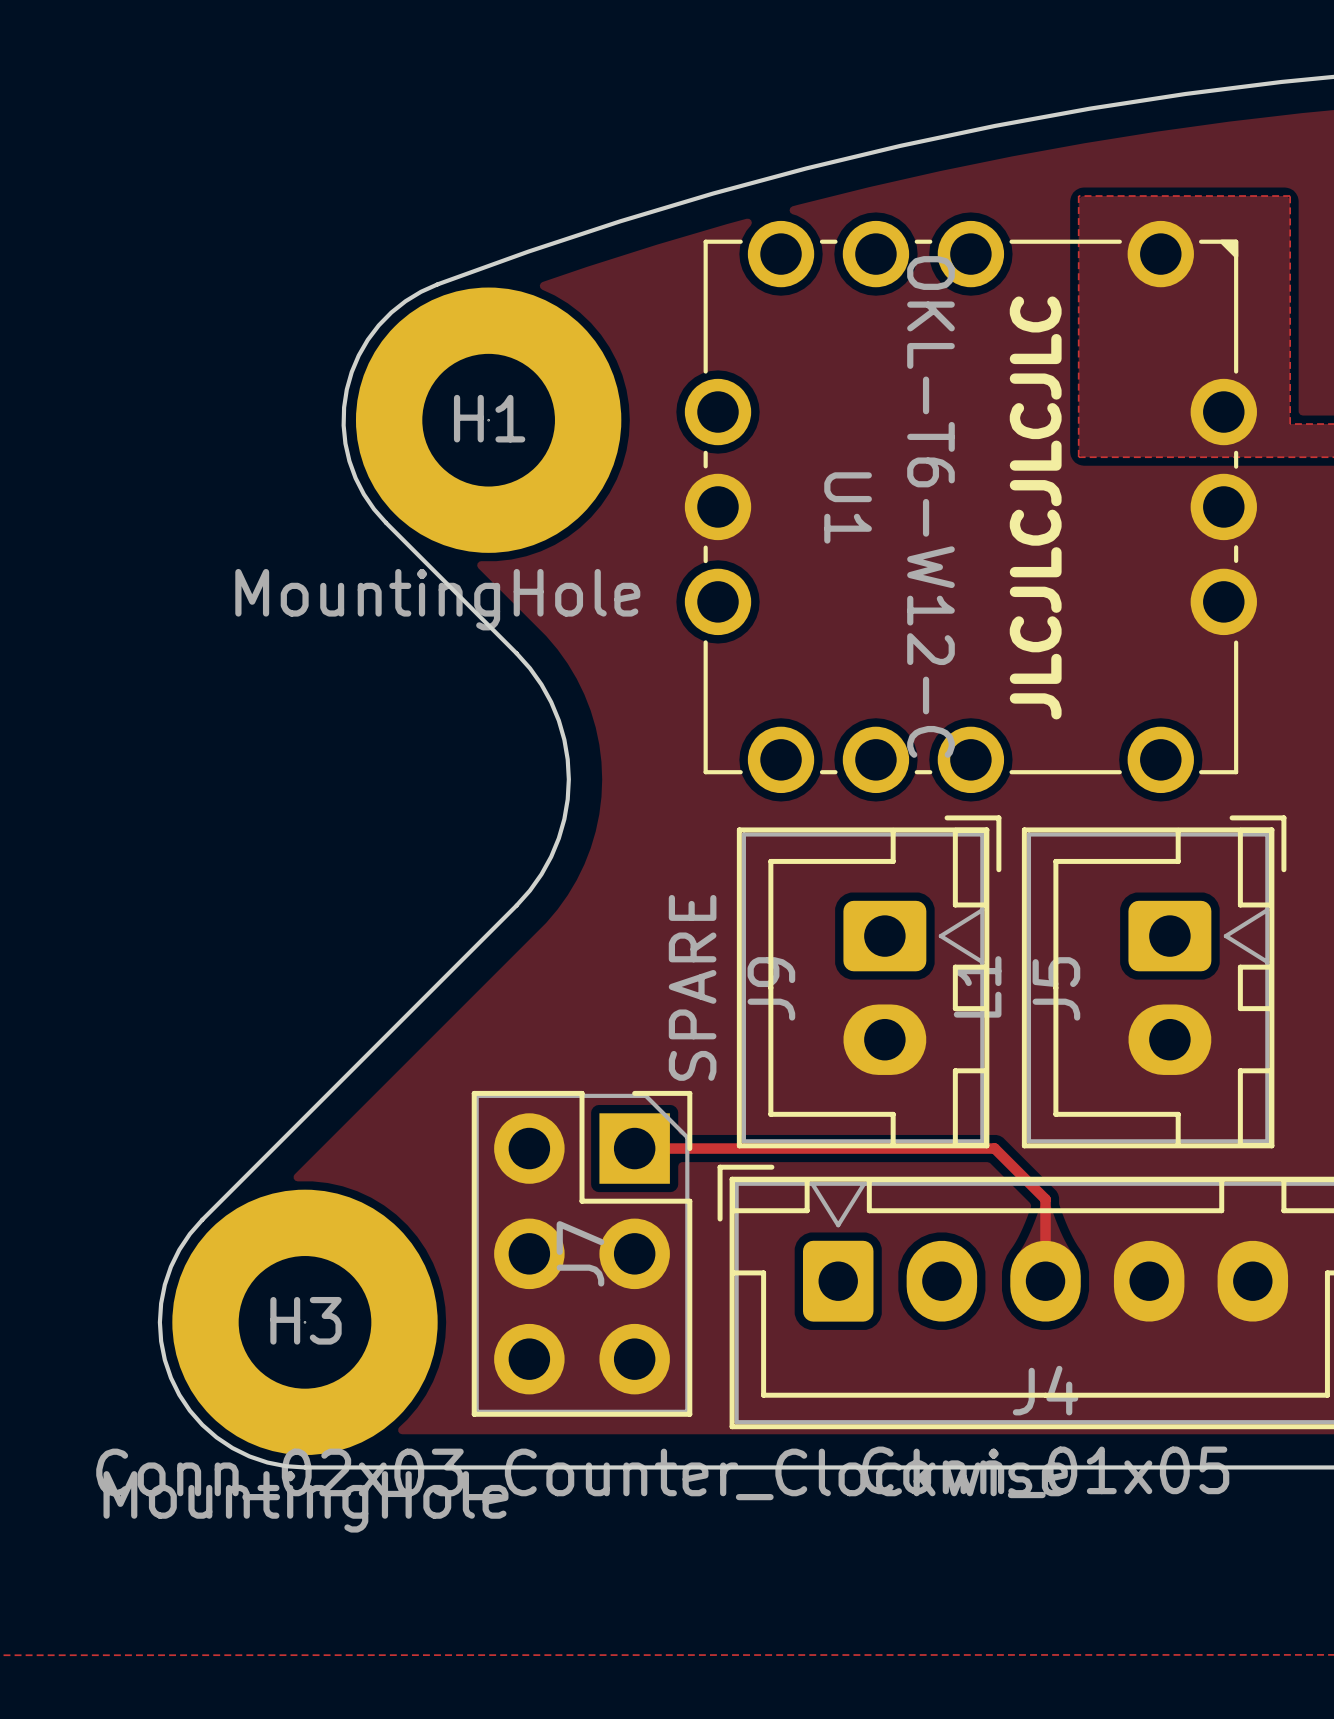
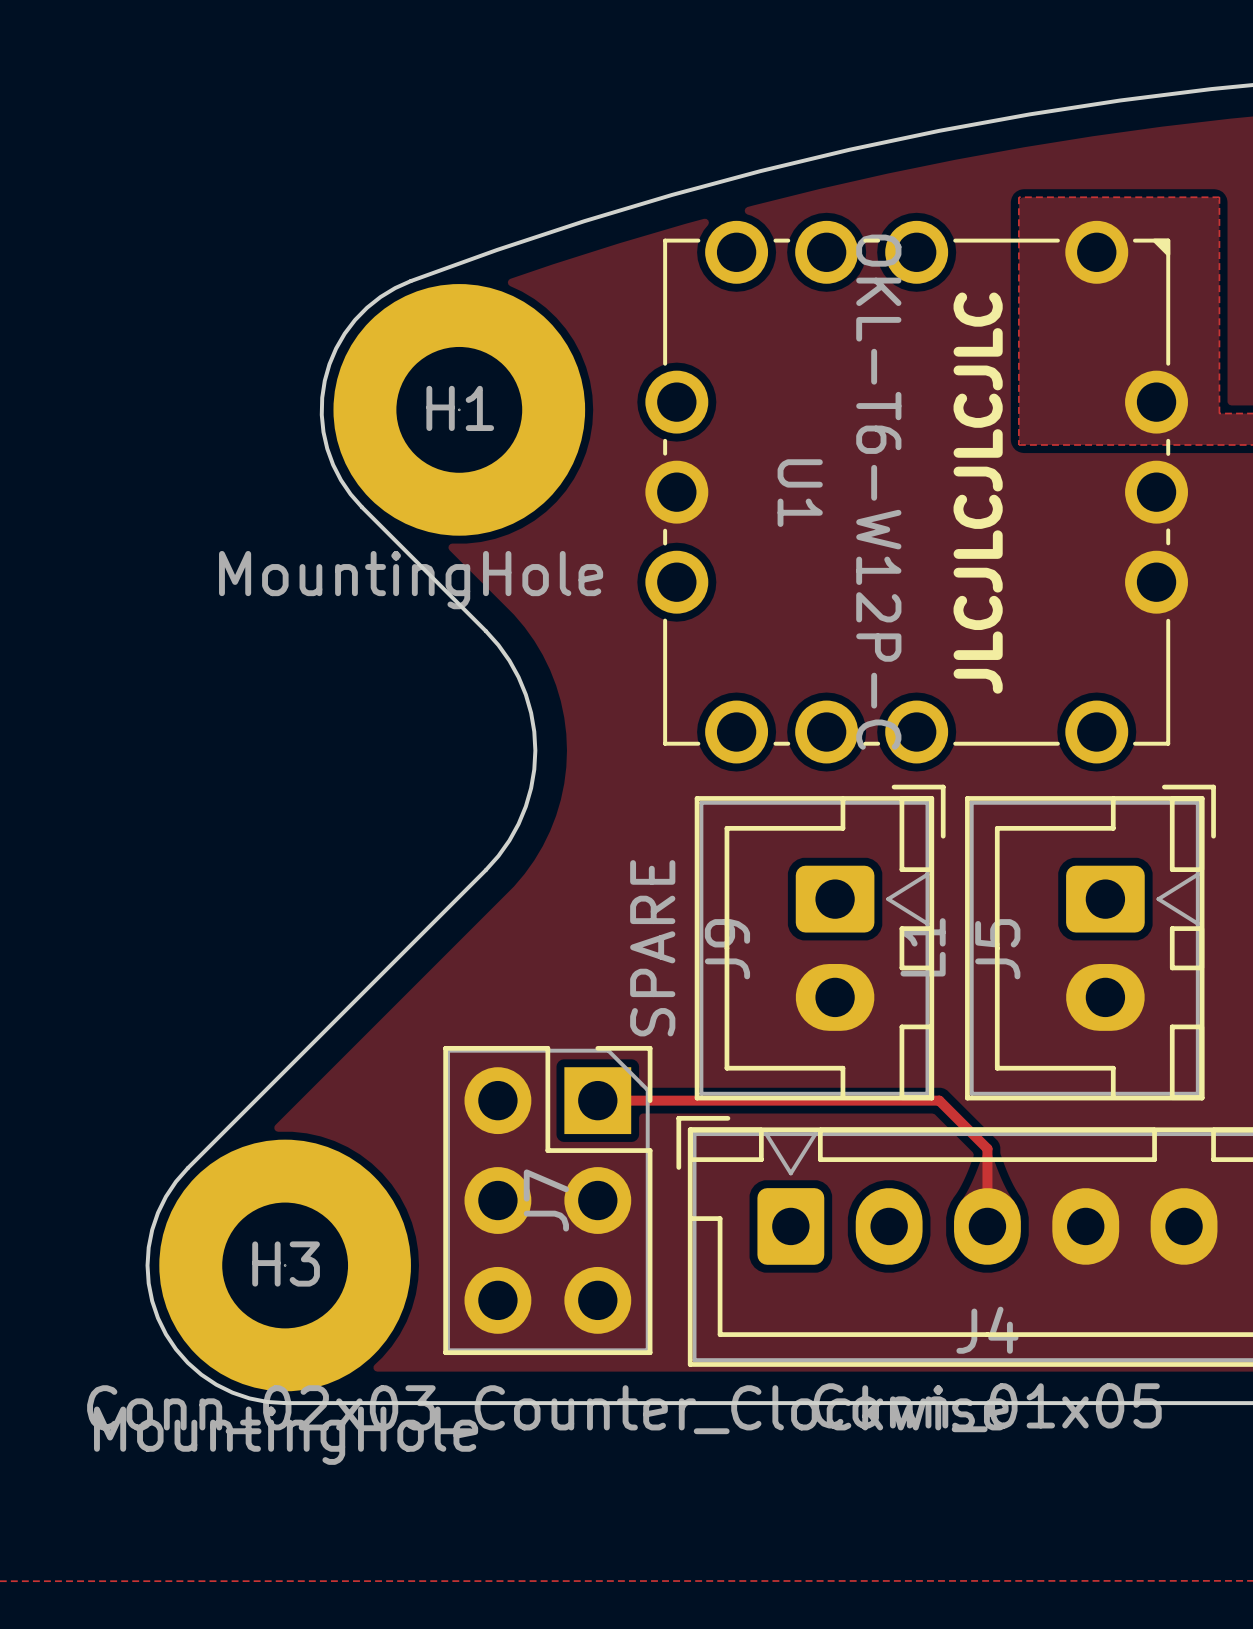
U1 value: OKL-T6-W12-C (930, 506) -> OKL-T6-W12P-C (878, 492)

